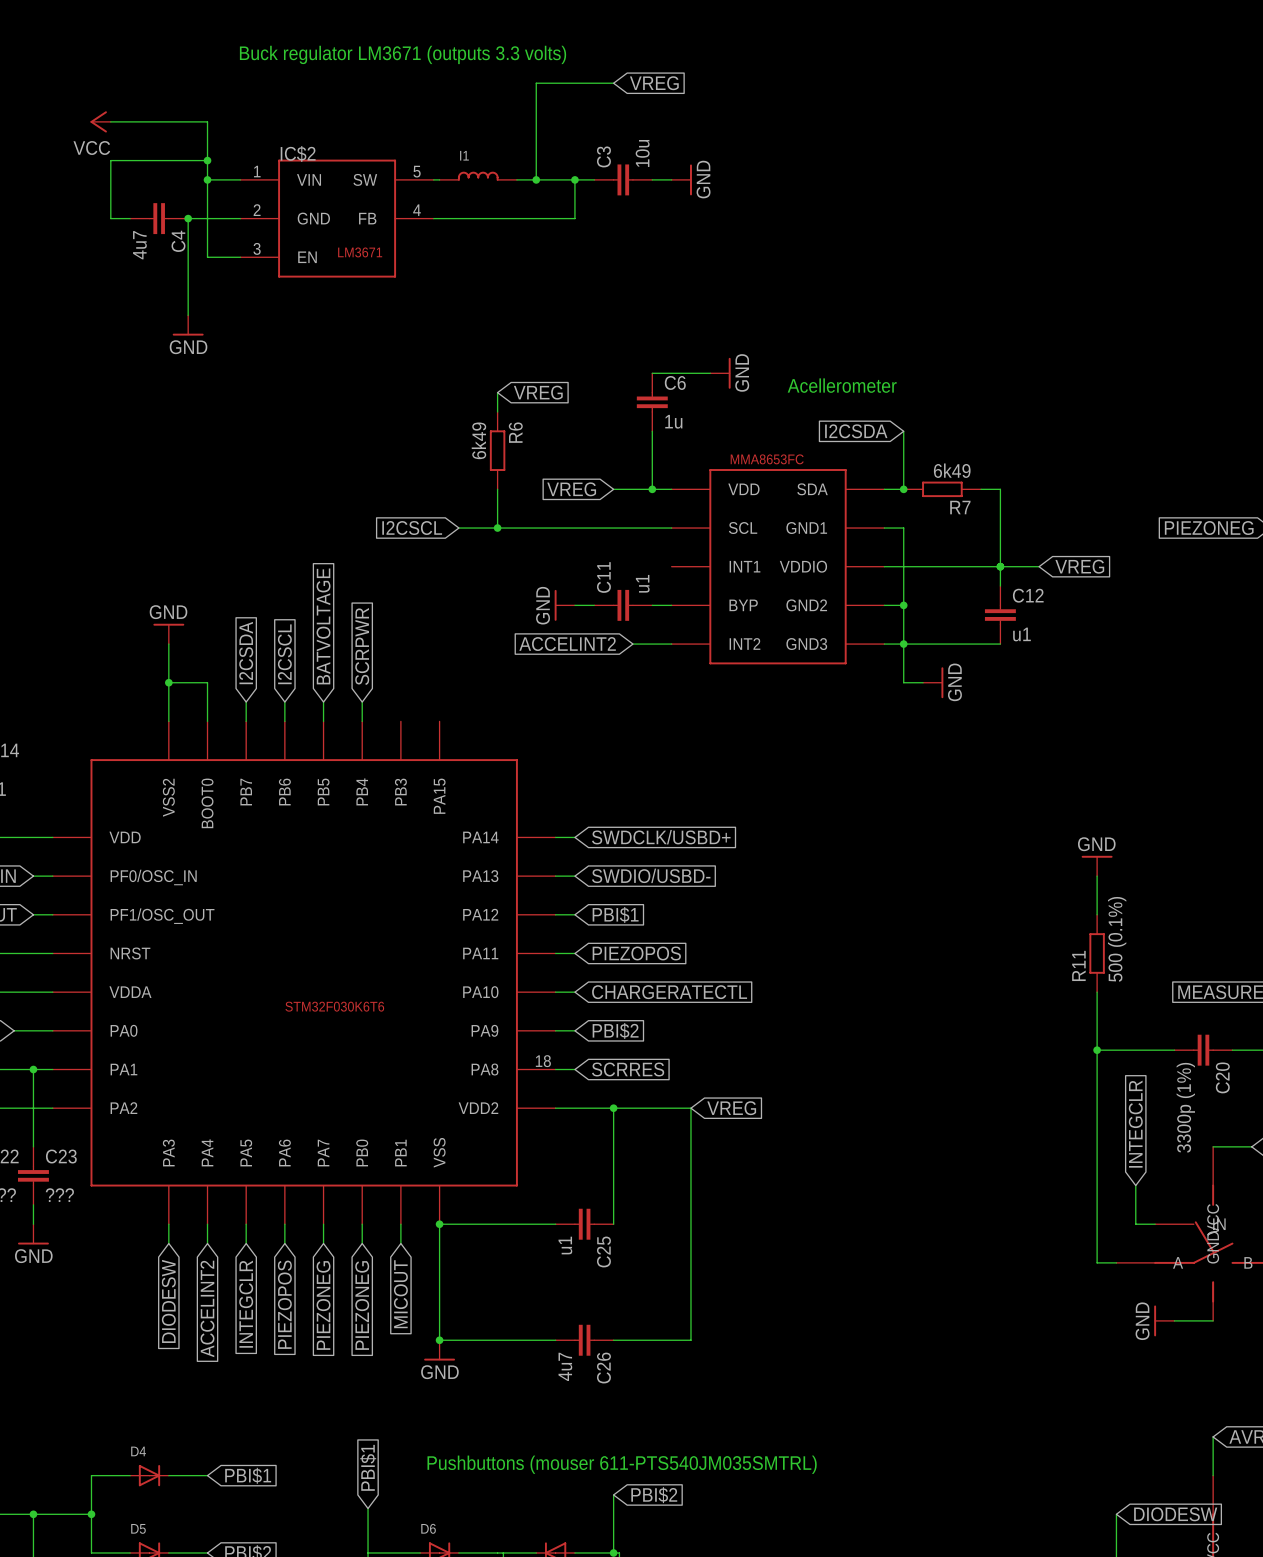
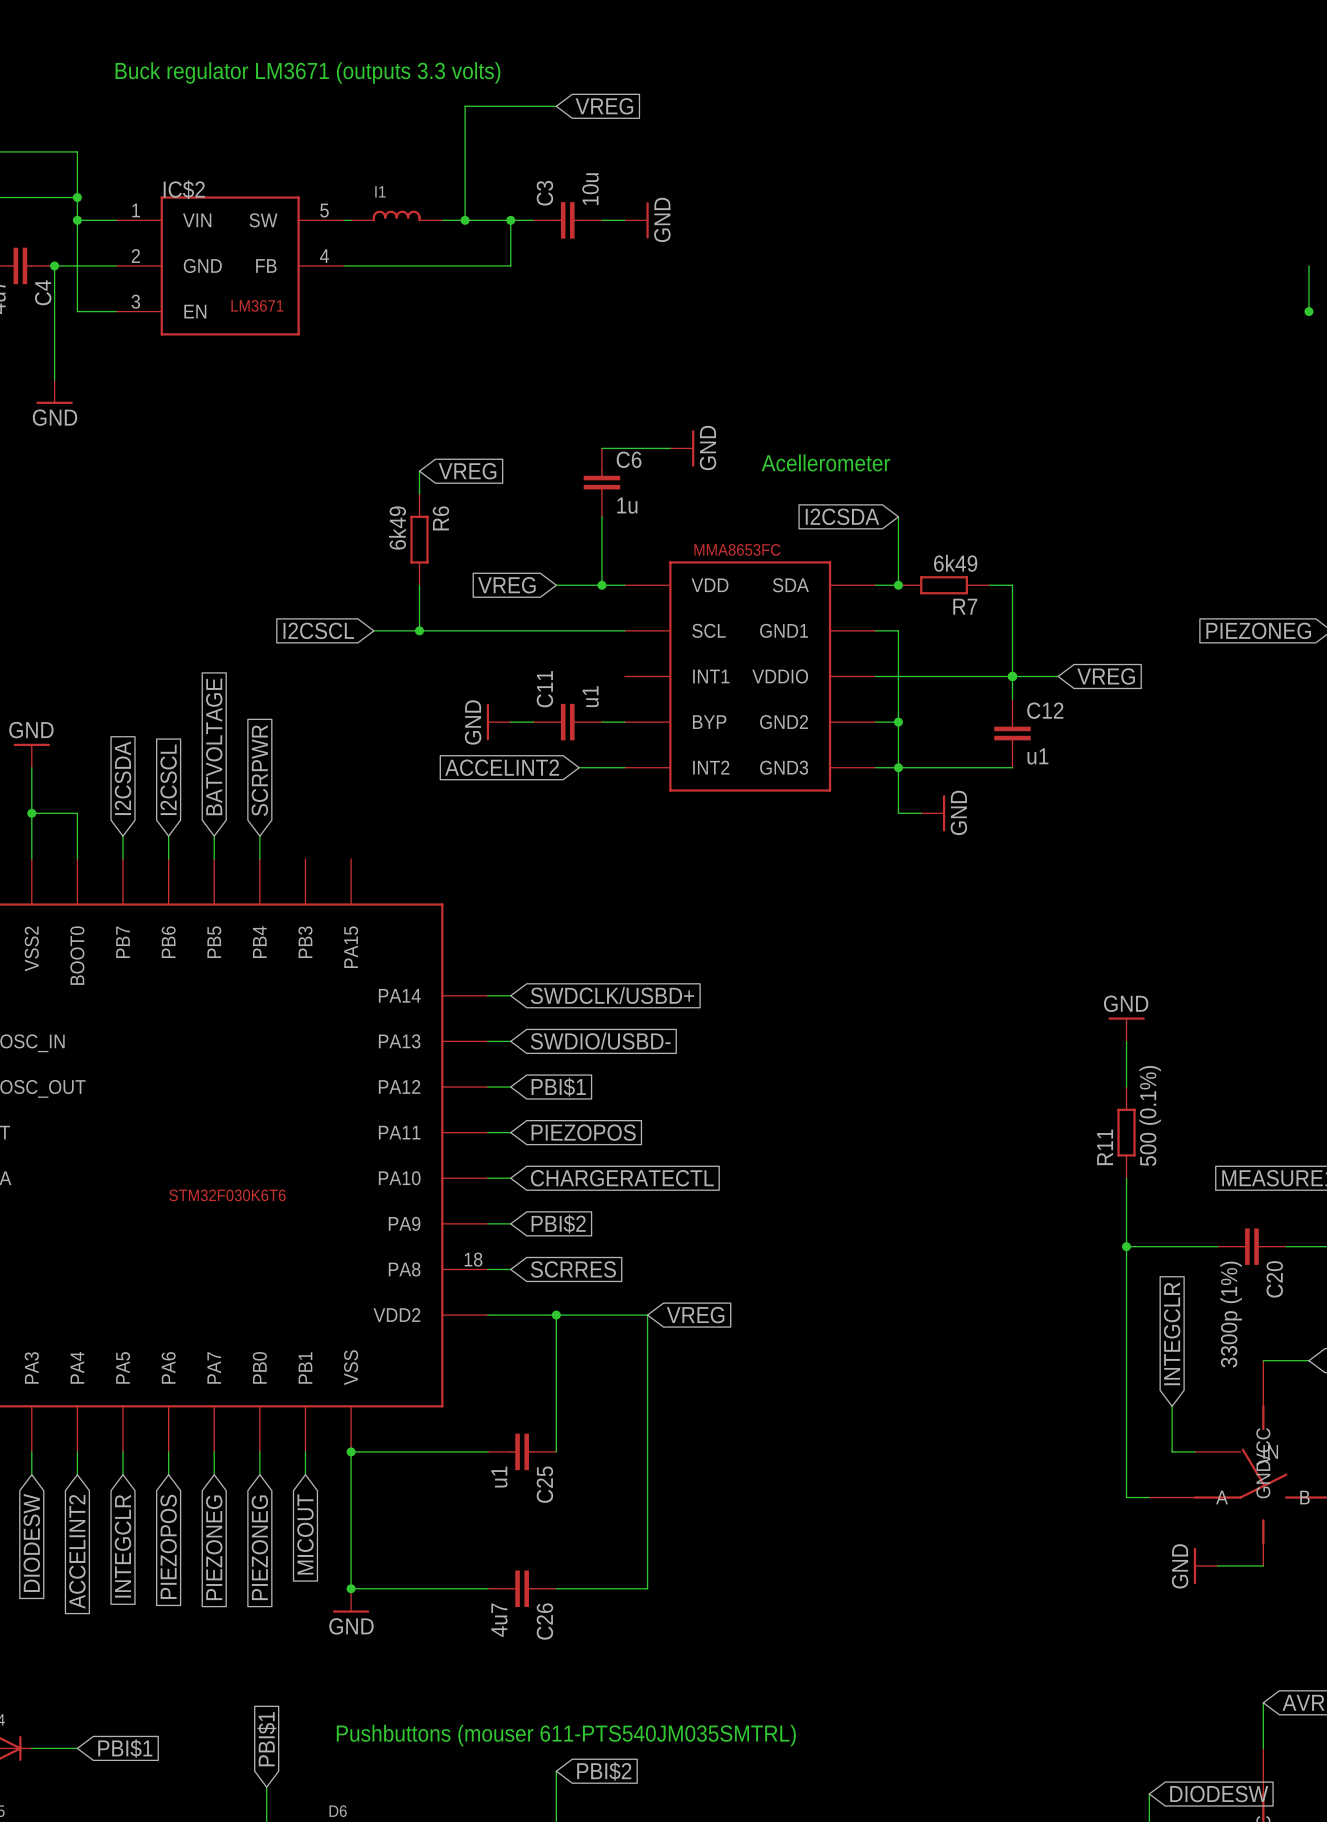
wire: none -> (1308, 265) (1308, 311)
junction: none -> (1308, 311)

